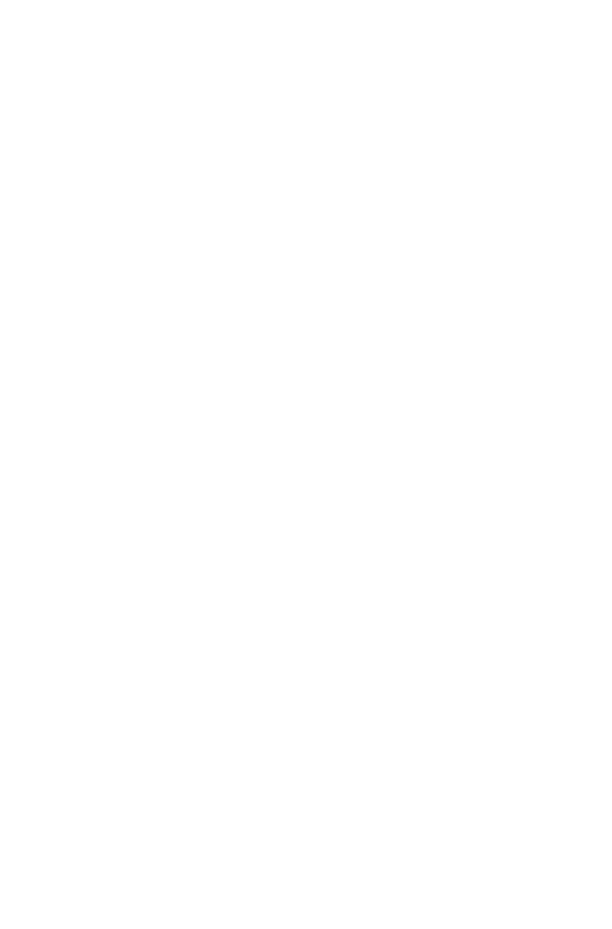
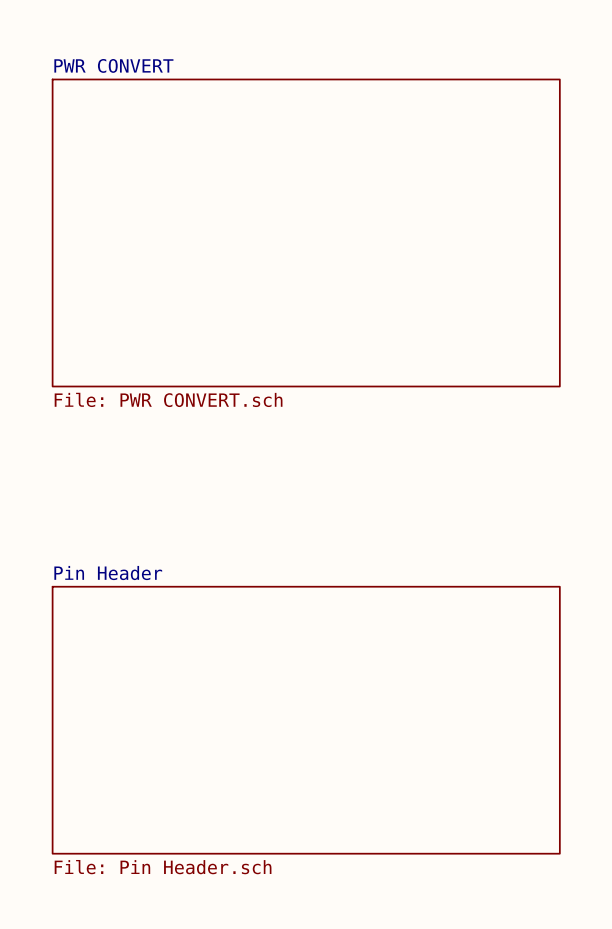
sheet PWR CONVERT: none -> File: PWR CONVERT.sch (306, 232)
sheet Pin Header: none -> File: Pin Header.sch (306, 720)

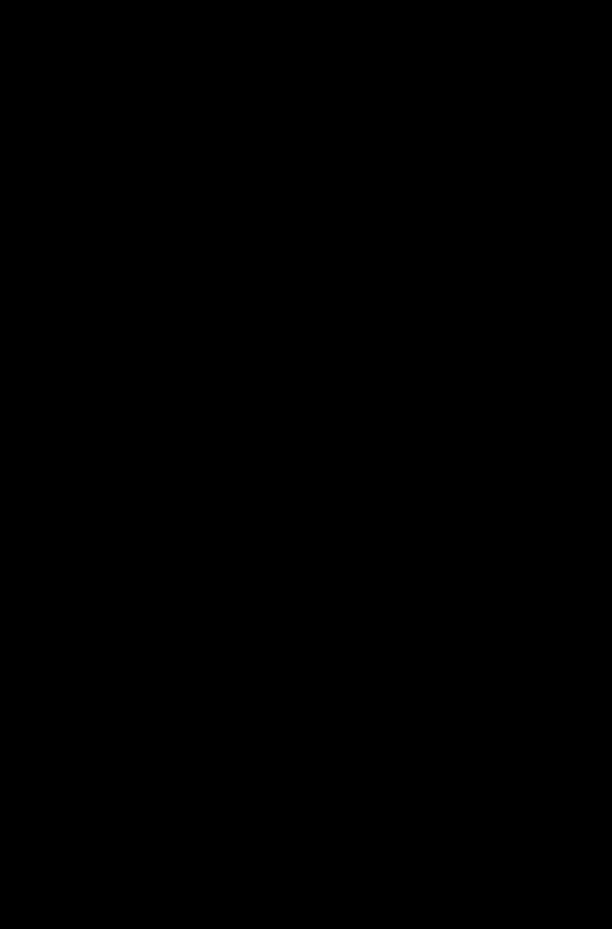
sheet PWR CONVERT: File: PWR CONVERT.sch (306, 232) -> none
sheet Pin Header: File: Pin Header.sch (306, 720) -> none

